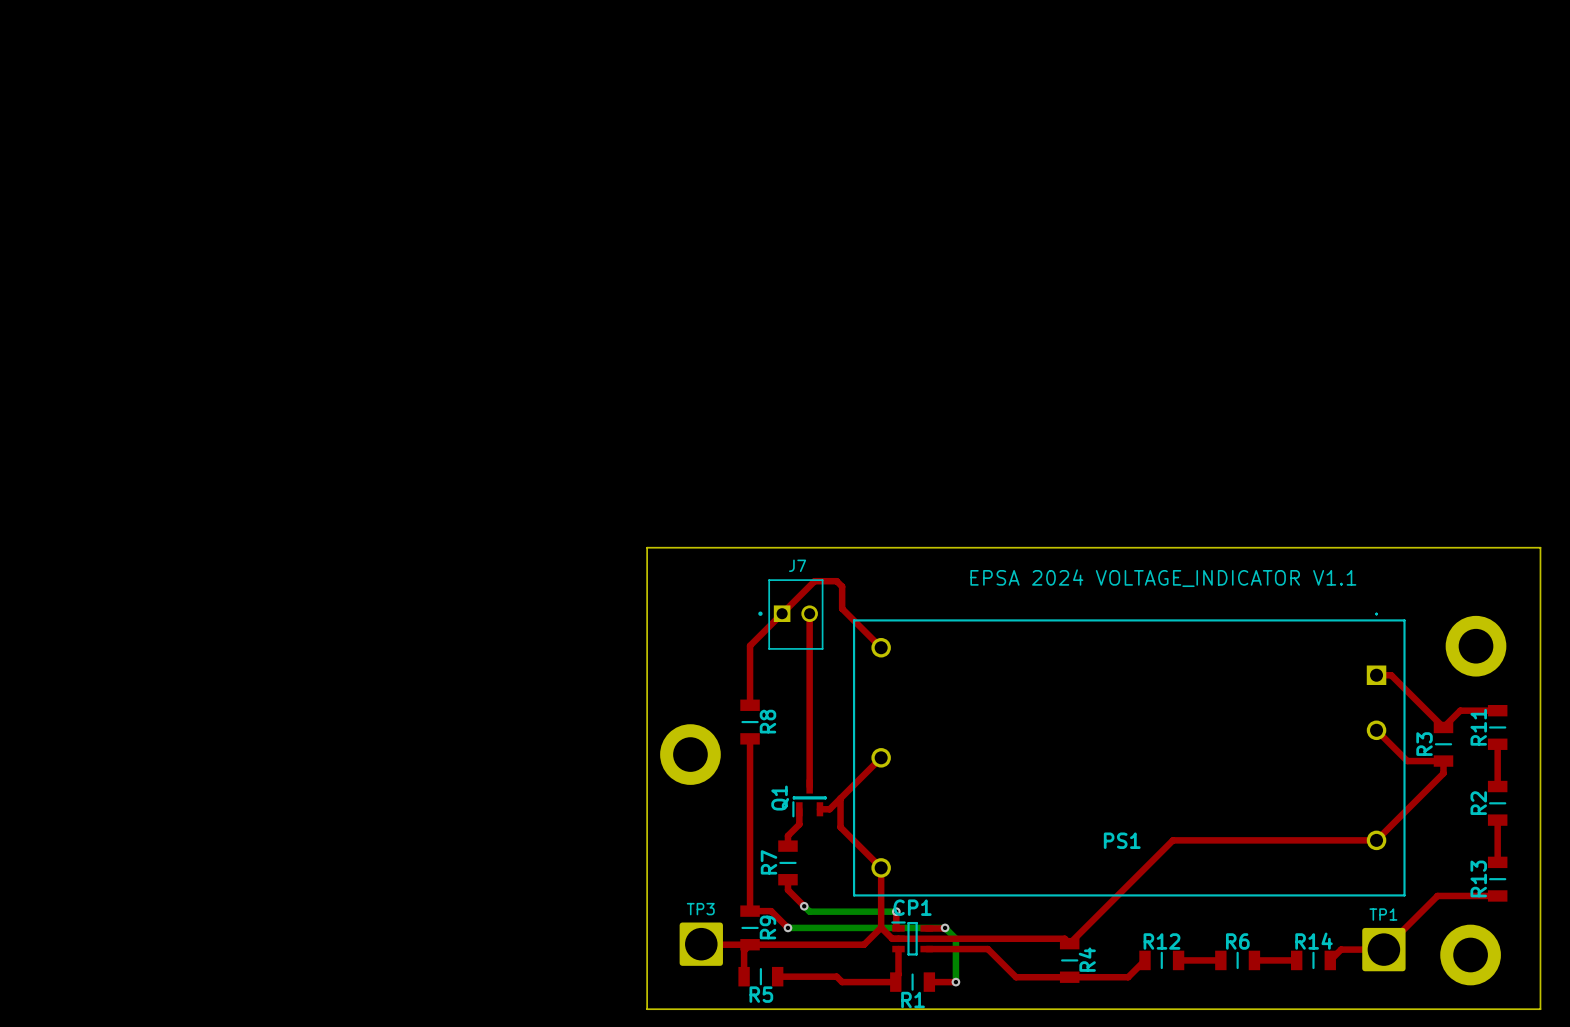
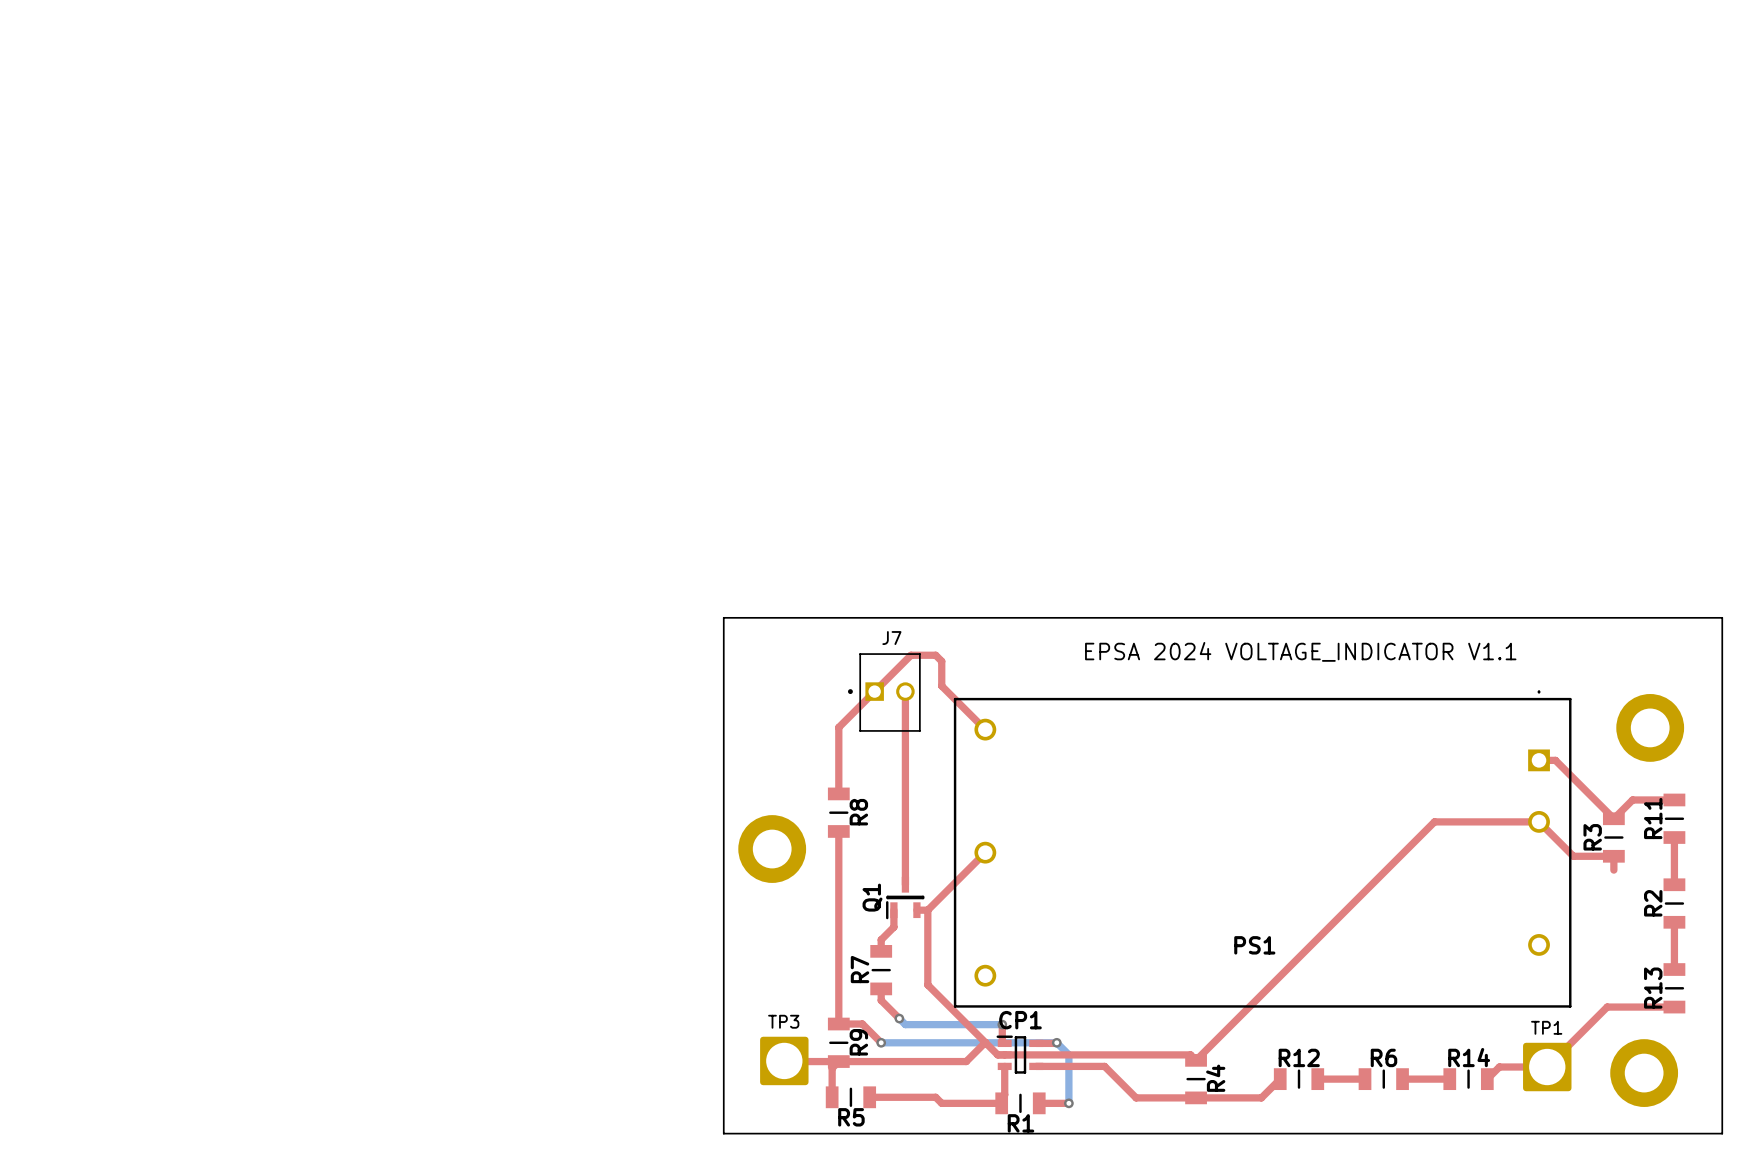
top track: (1443, 773) (1376, 840) (1172, 840) -> (1539, 821) (1434, 821) (1311, 944)
top track: (840, 798) (840, 827) (881, 867) (881, 927) -> (927, 910) (927, 984) (985, 1042)

